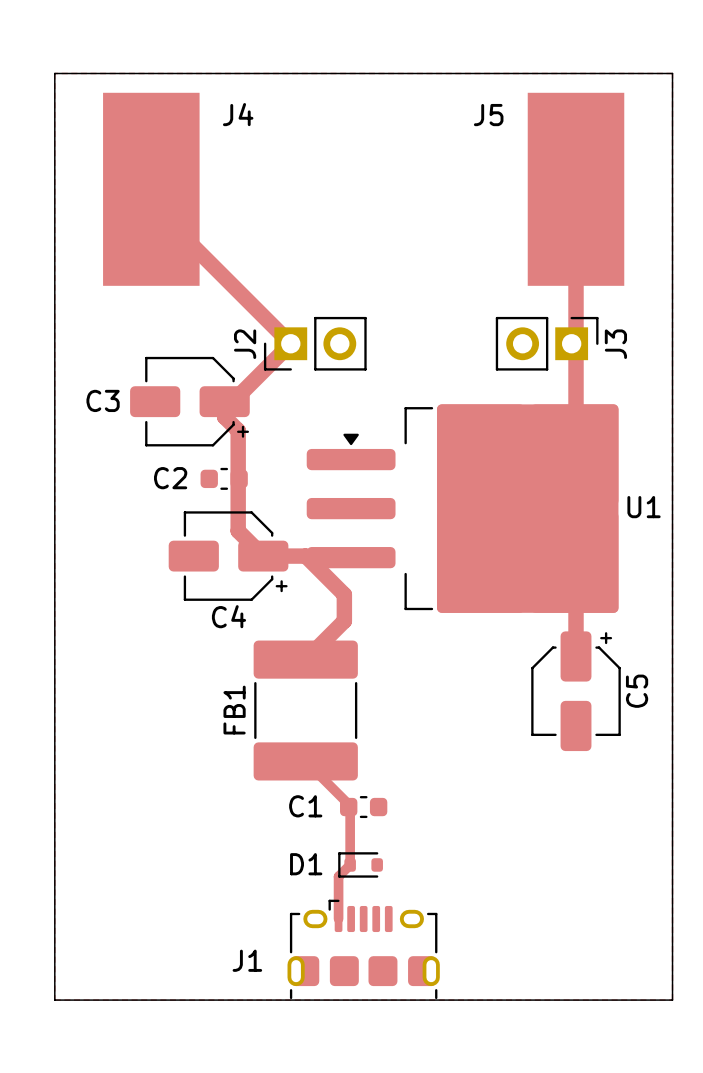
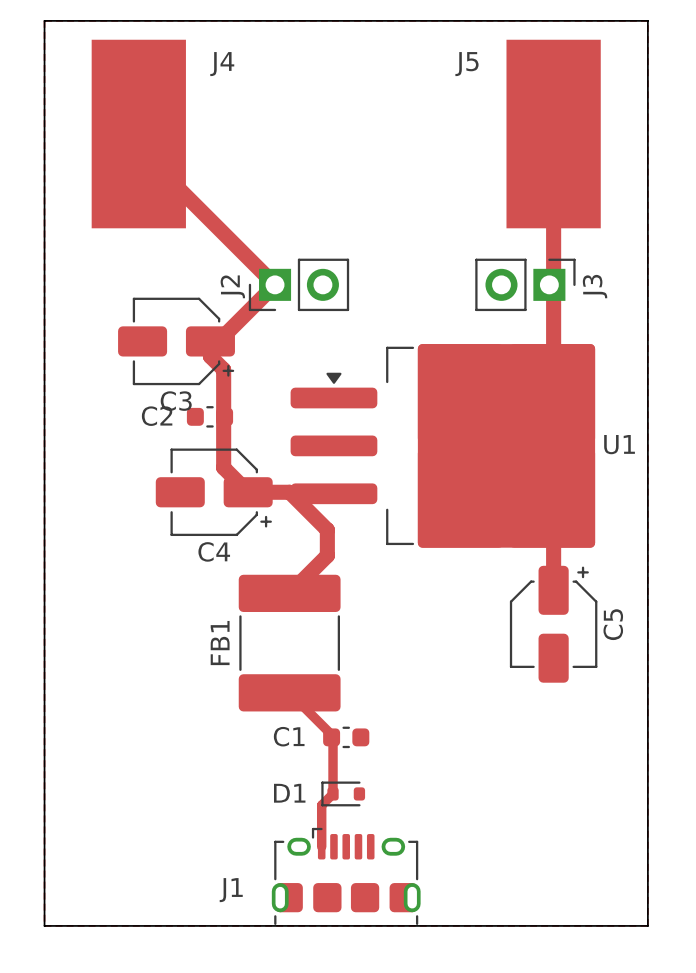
C3 name position: C3 (103, 400) -> C3 (176, 401)

